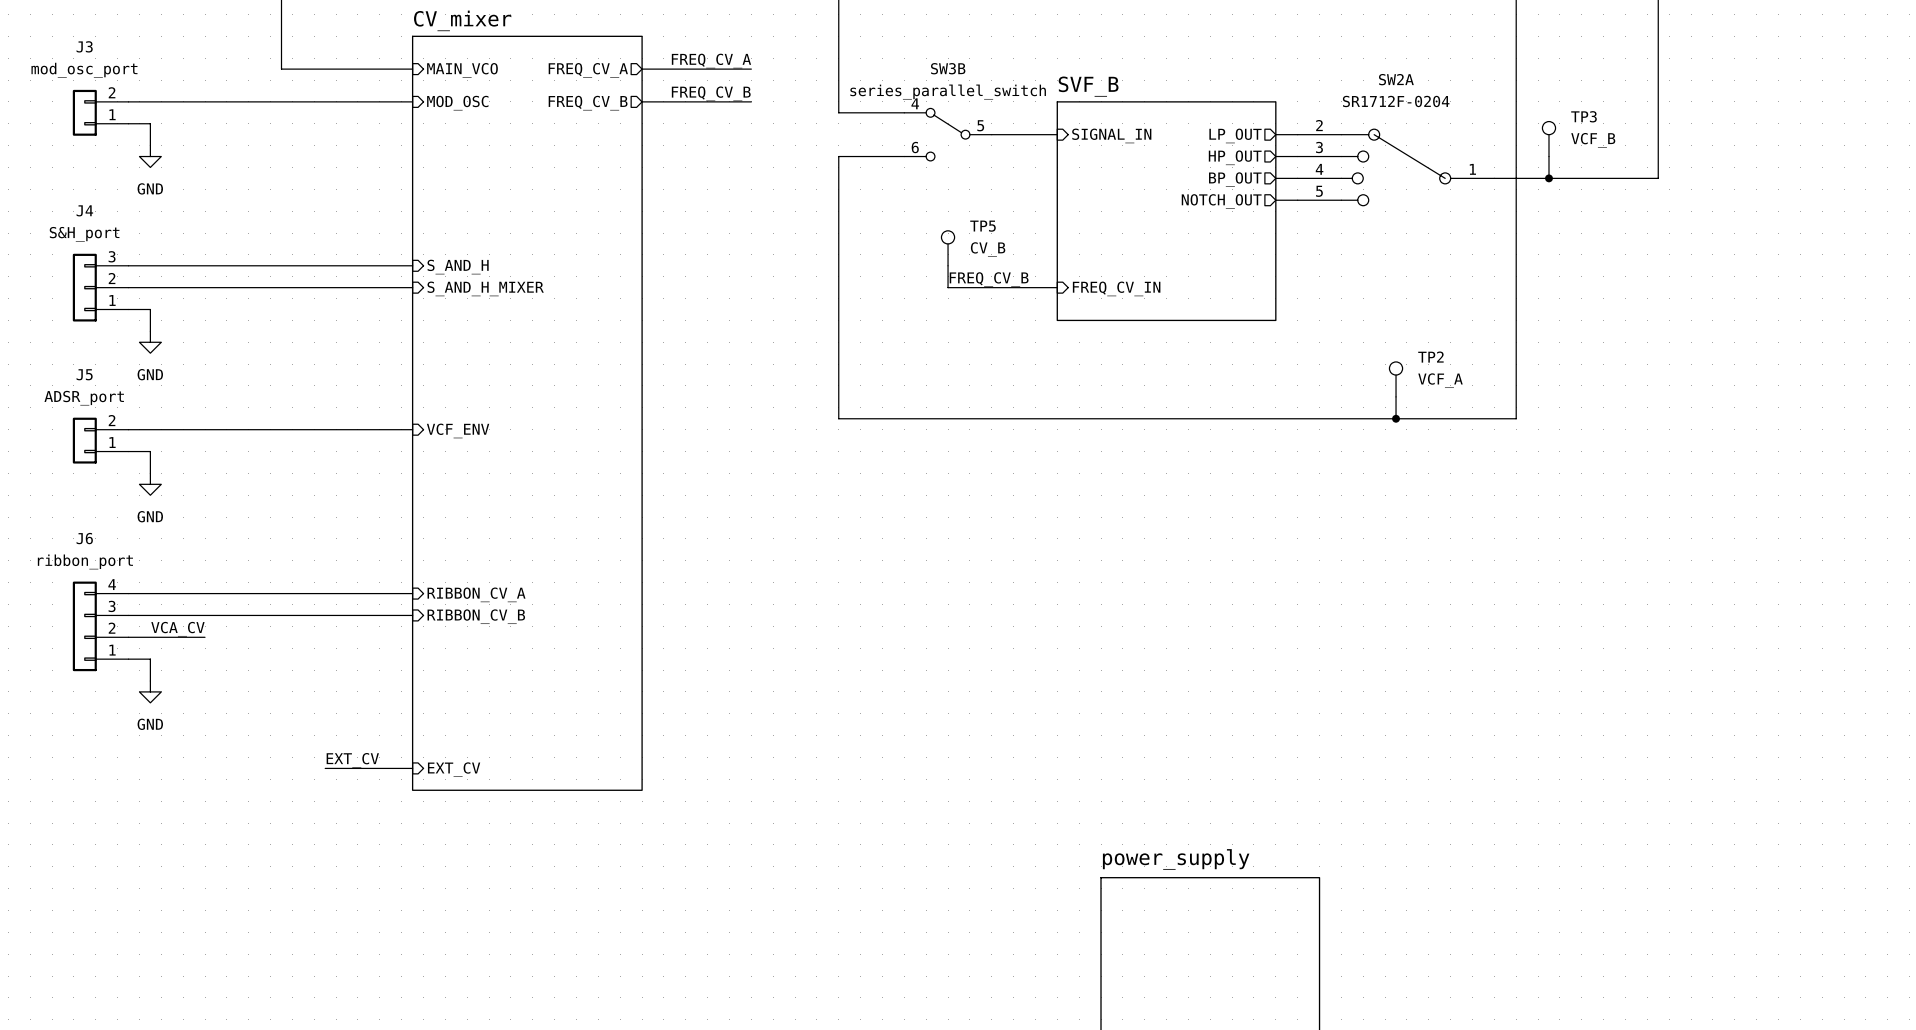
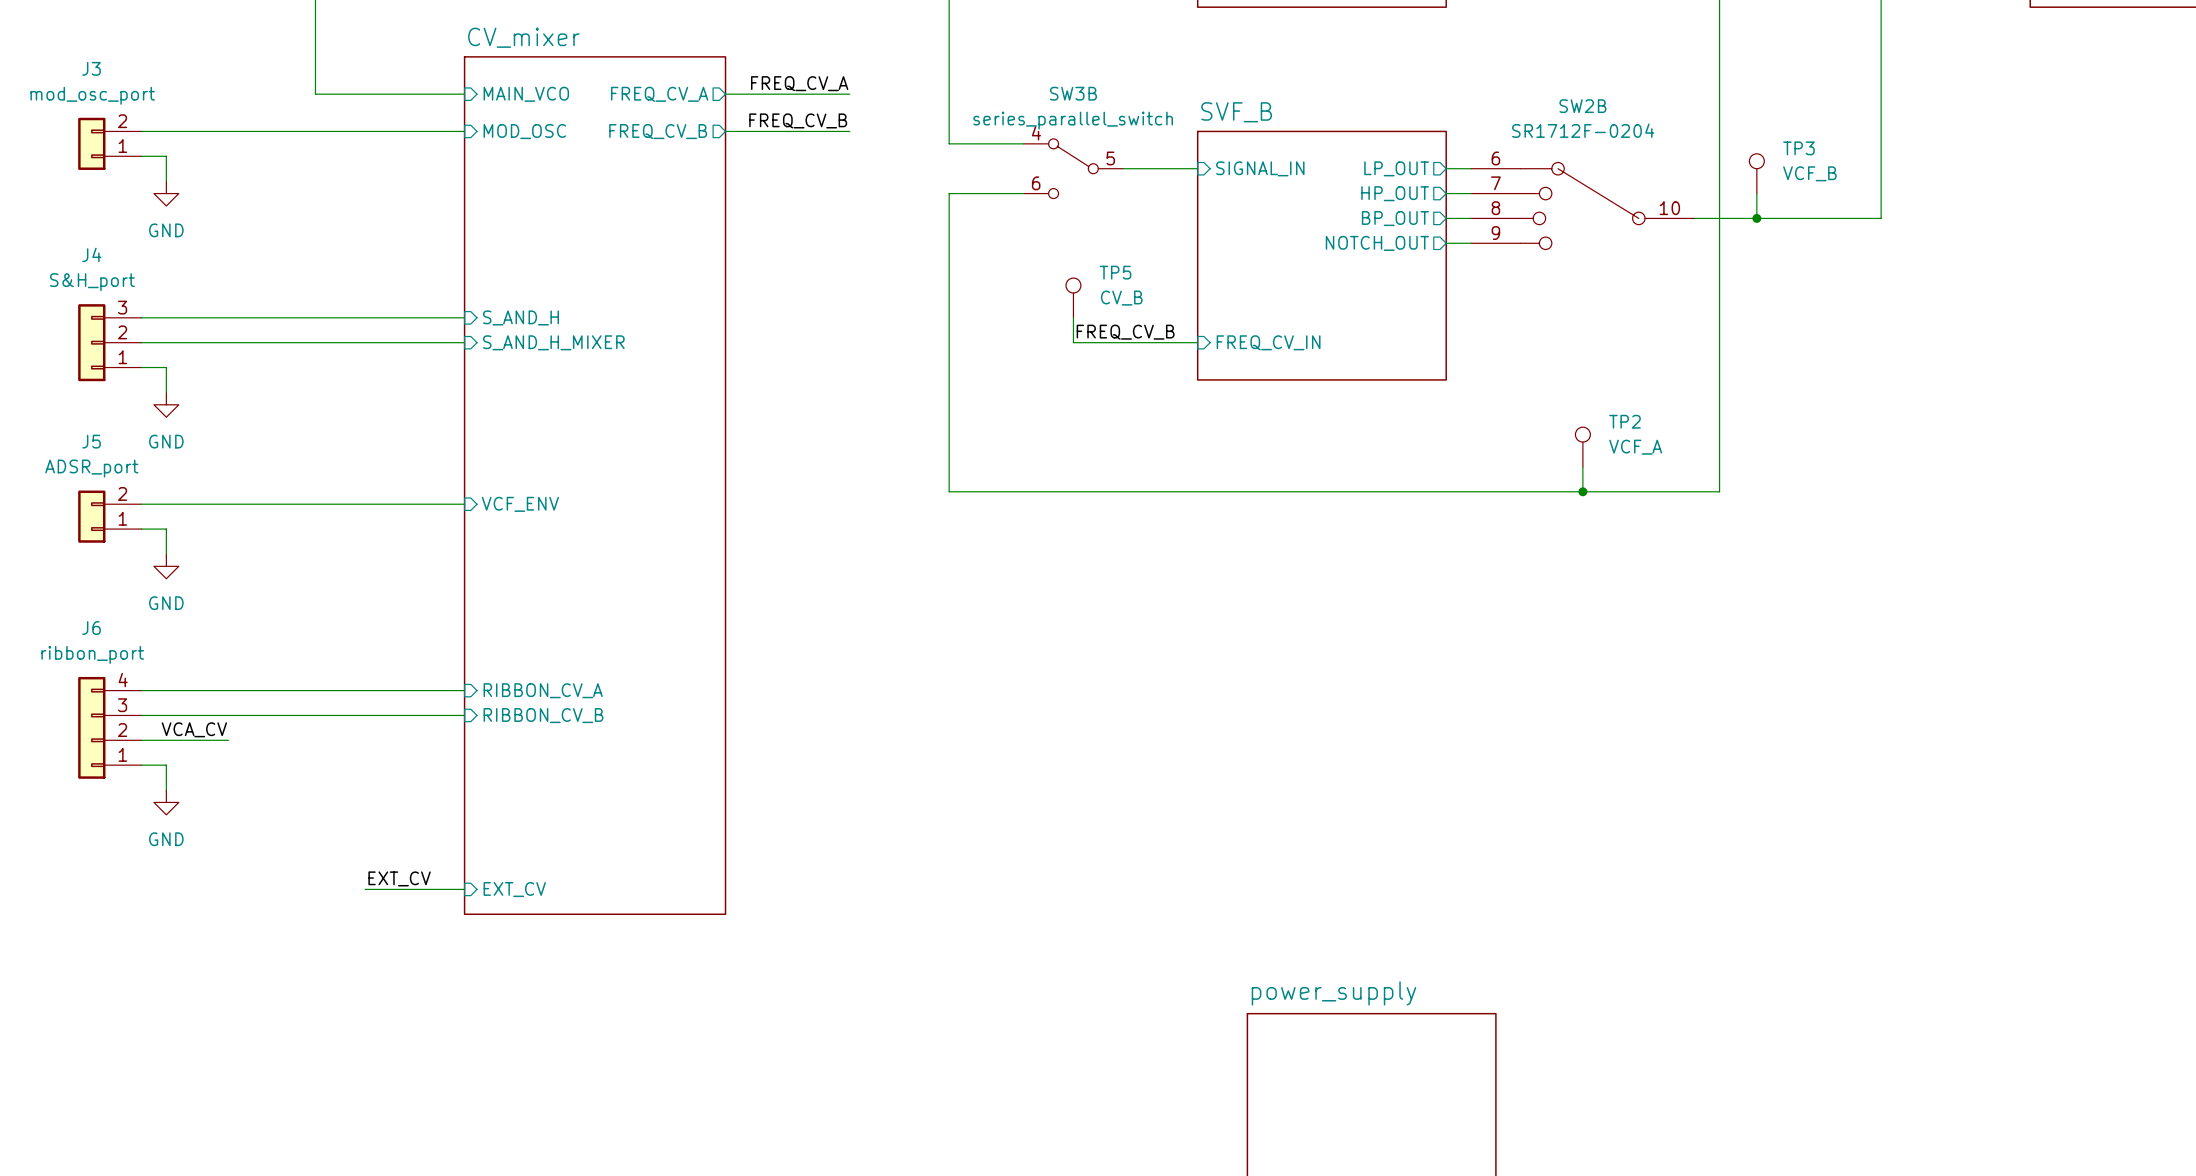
SW2A name: SW2A (1396, 79) -> SW2B (1582, 106)
SW2A pin number: 2 (1319, 125) -> 6 (1495, 158)
SW2A pin number: 3 (1319, 147) -> 7 (1495, 183)
SW2A pin number: 4 (1319, 169) -> 8 (1495, 208)
SW2A pin number: 1 (1472, 169) -> 10 (1669, 208)
SW2A pin number: 5 (1319, 191) -> 9 (1495, 233)

